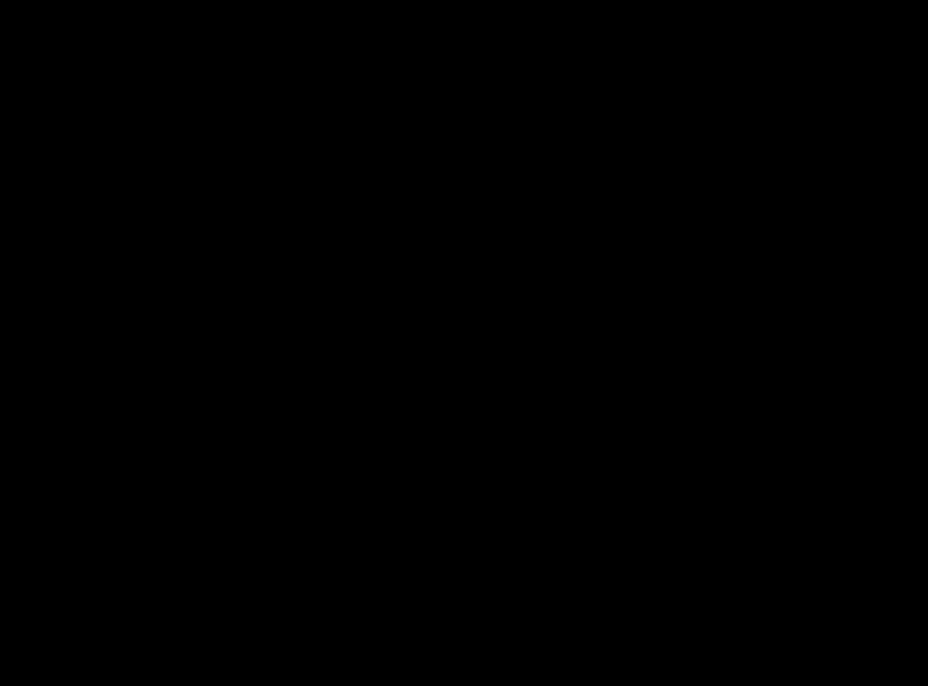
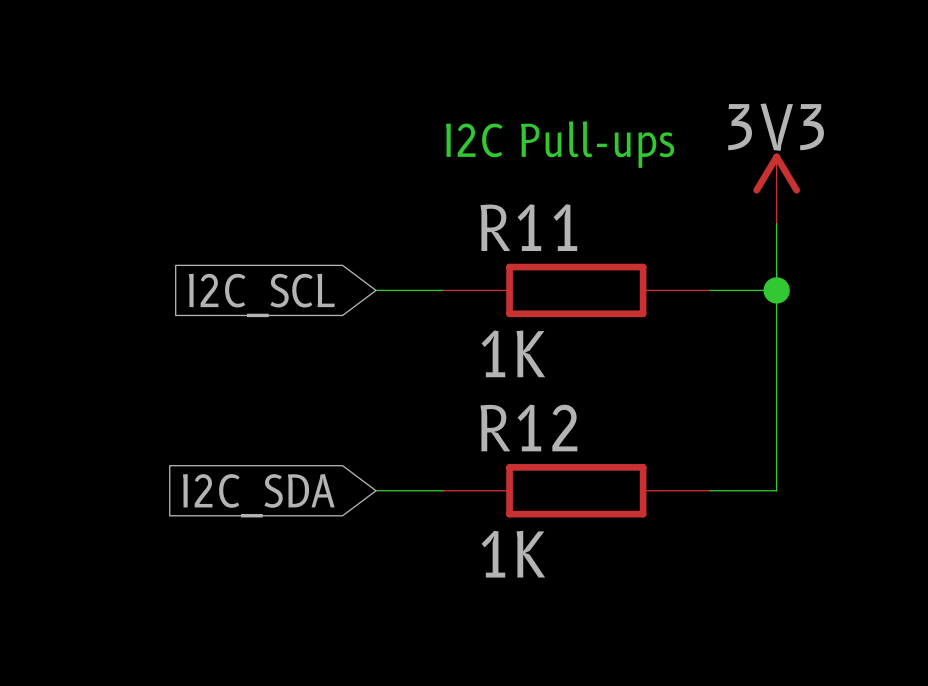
text: none -> I2C Pull-ups (560, 144)
power symbol: none -> 3V3 (776, 188)
wire: none -> (776, 223) (776, 490) (709, 490)
wire: none -> (376, 290) (442, 290)
R11: none -> 1K (576, 290)
wire: none -> (709, 290) (776, 290)
junction: none -> (776, 290)
global label: none -> I2C_SCL (261, 295)
wire: none -> (376, 490) (442, 490)
R12: none -> 1K (576, 490)
global label: none -> I2C_SDA (258, 495)

